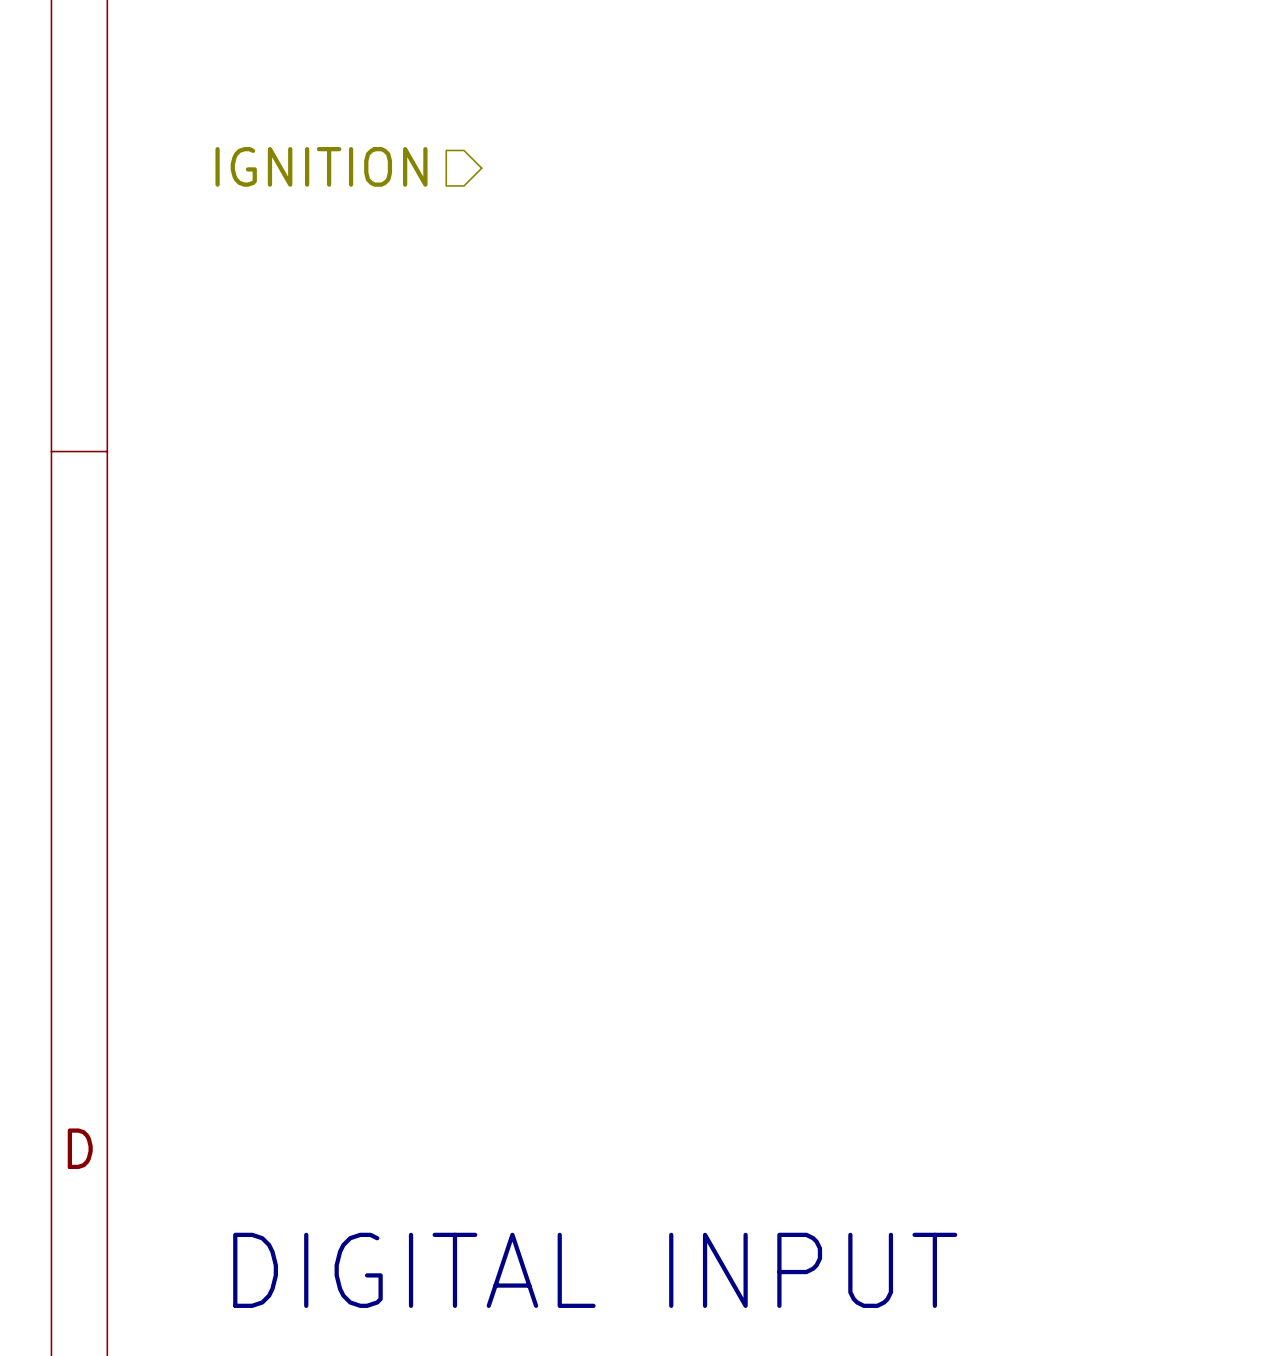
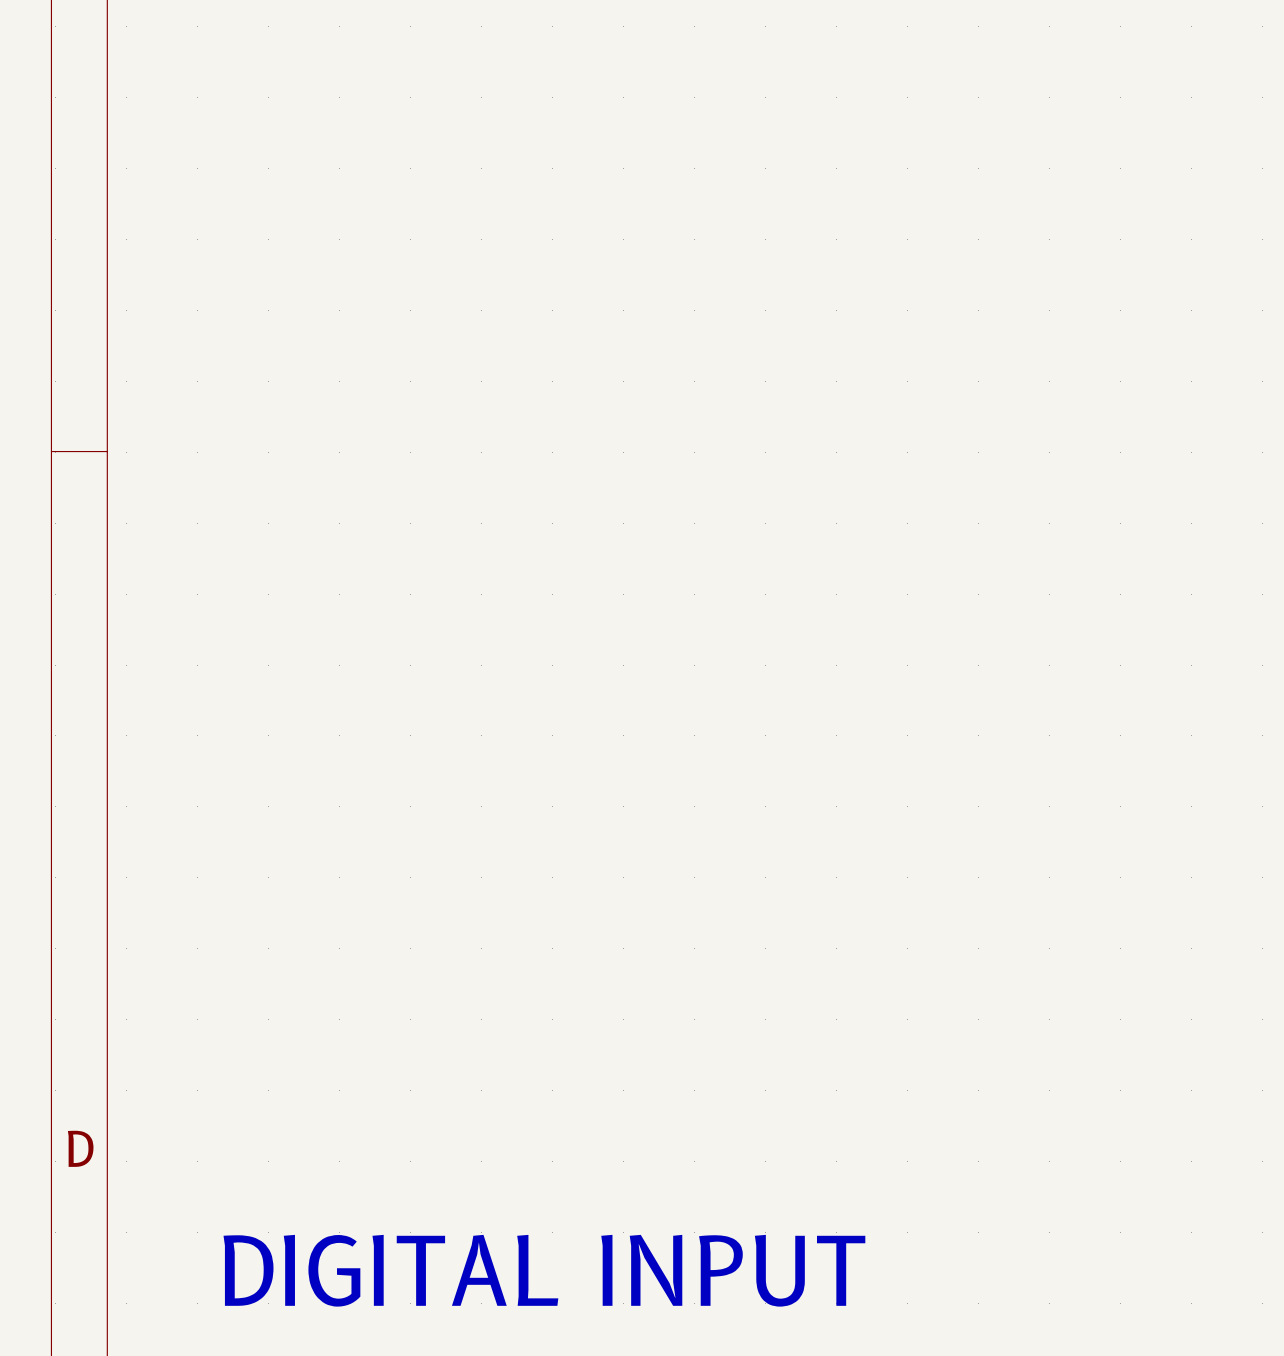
hierarchical label: IGNITION (321, 166) -> none

